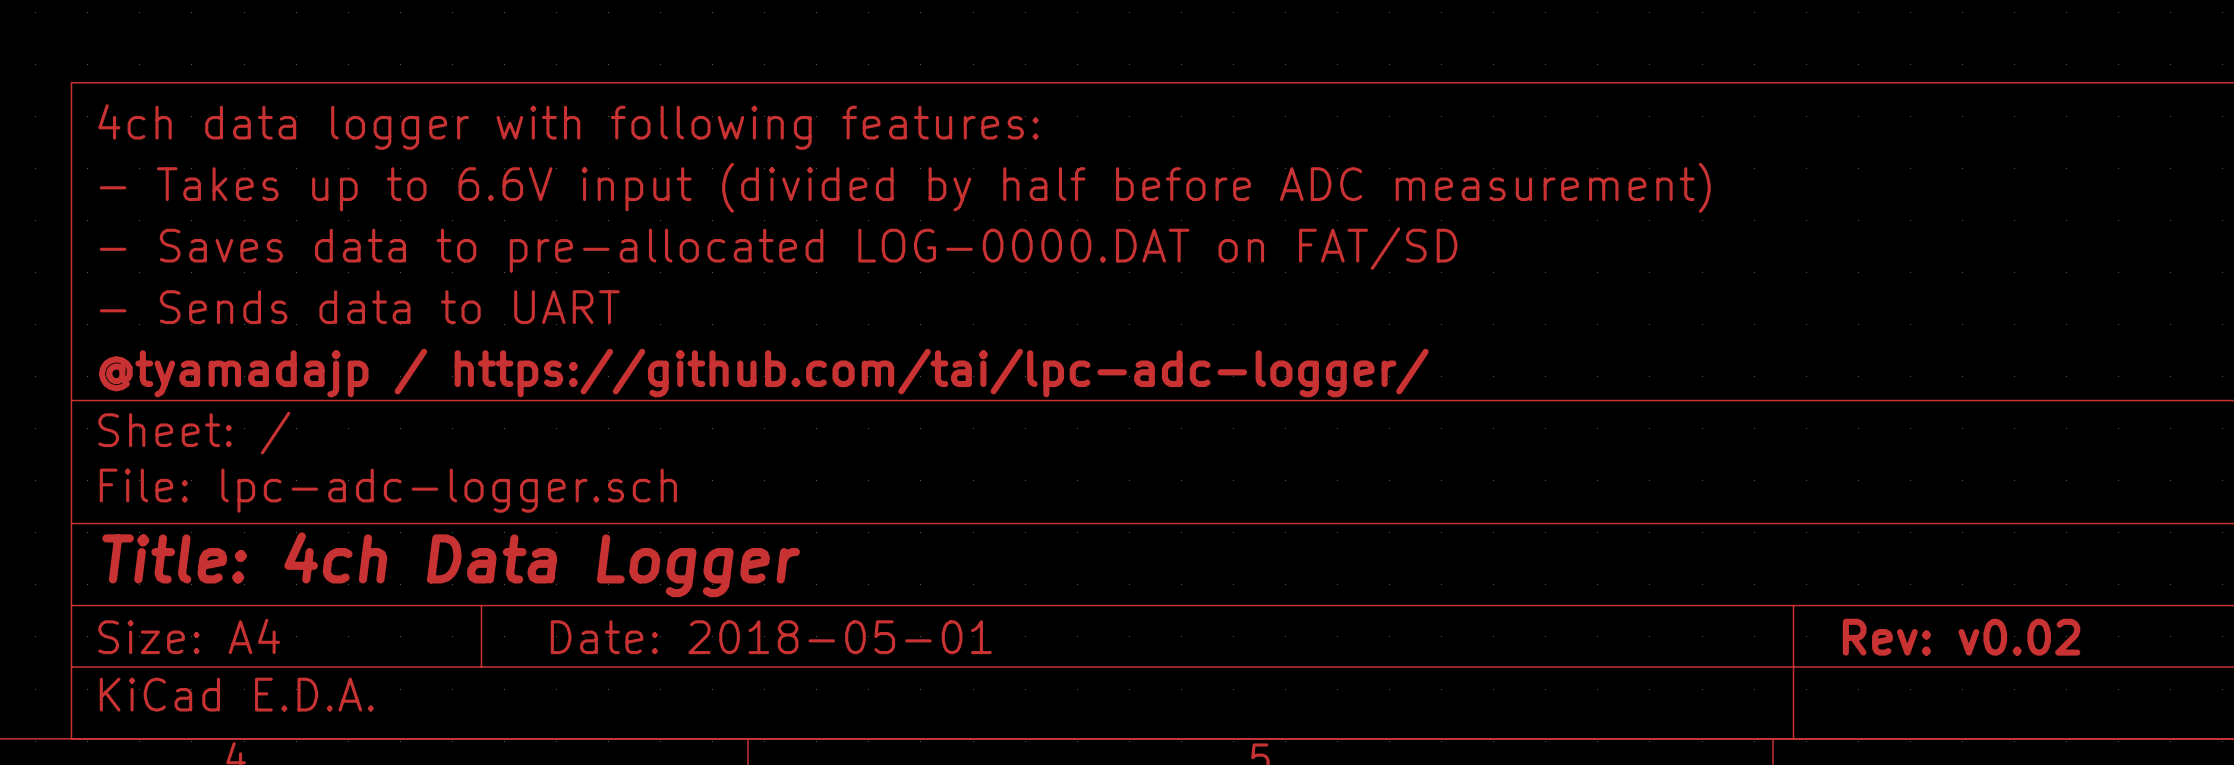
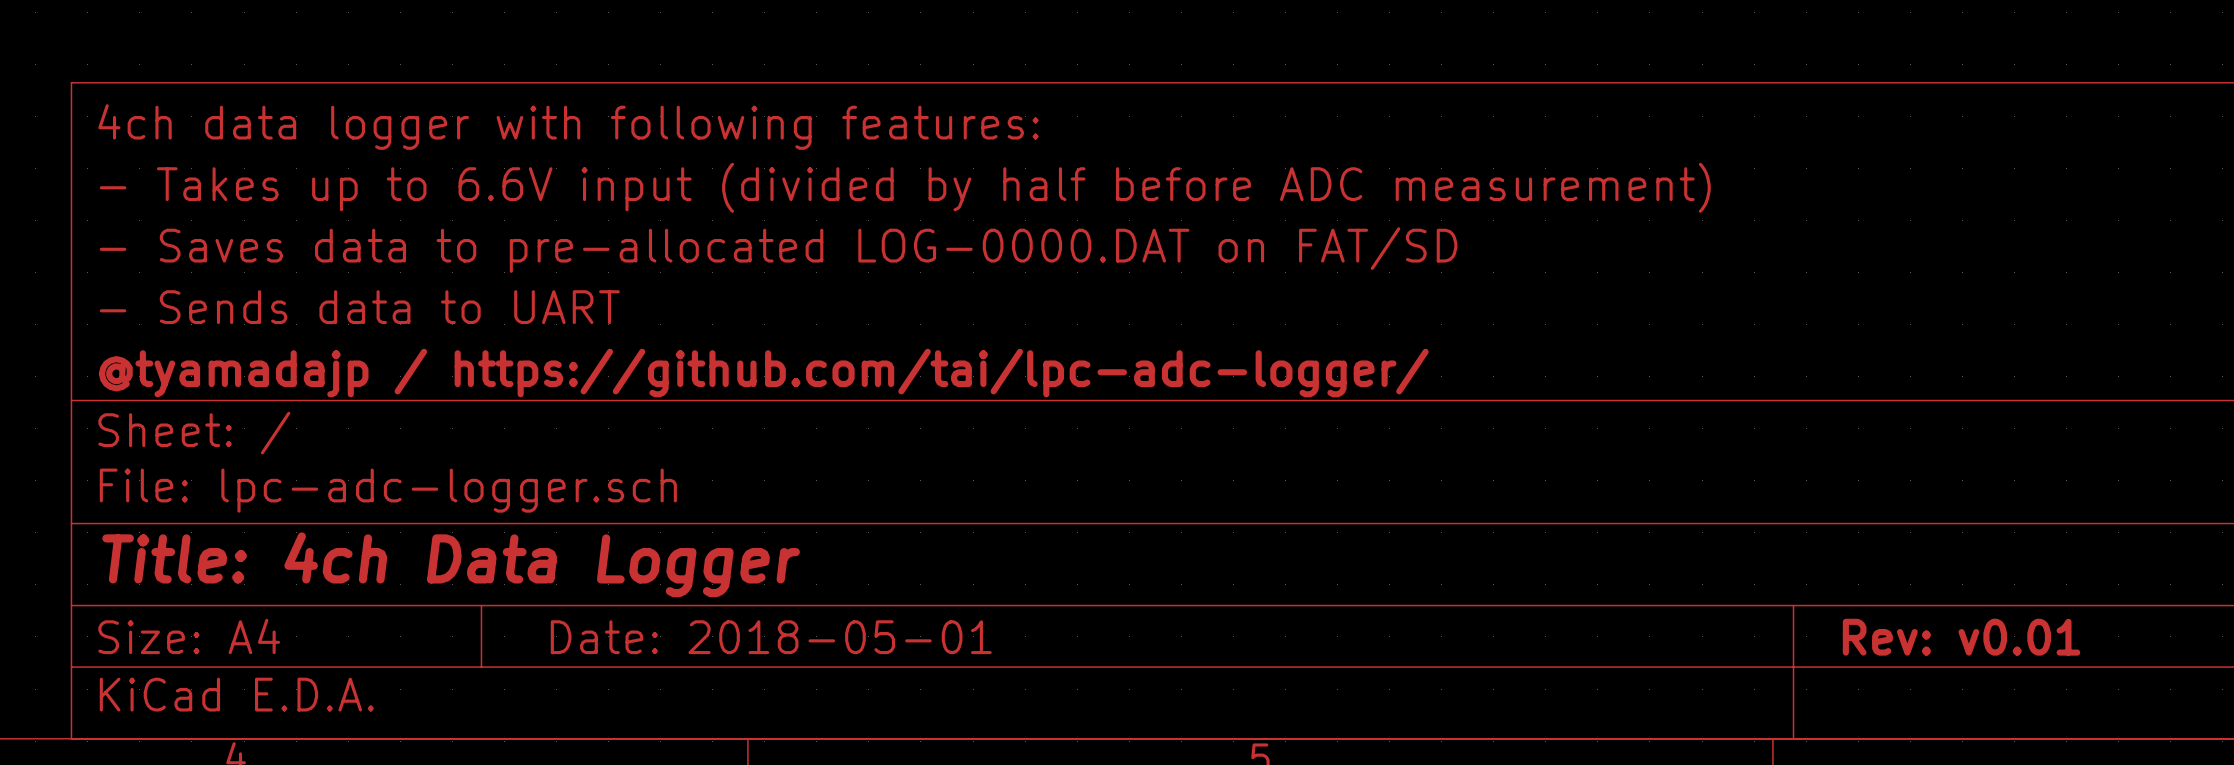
title block: Rev: v0.02 (1961, 637) -> Rev: v0.01 (1961, 637)

